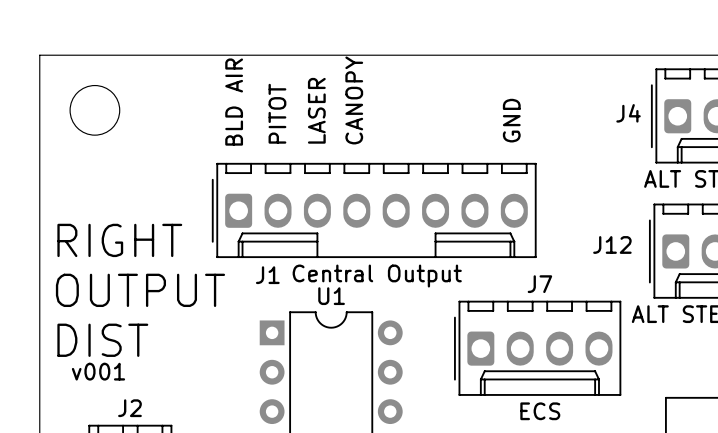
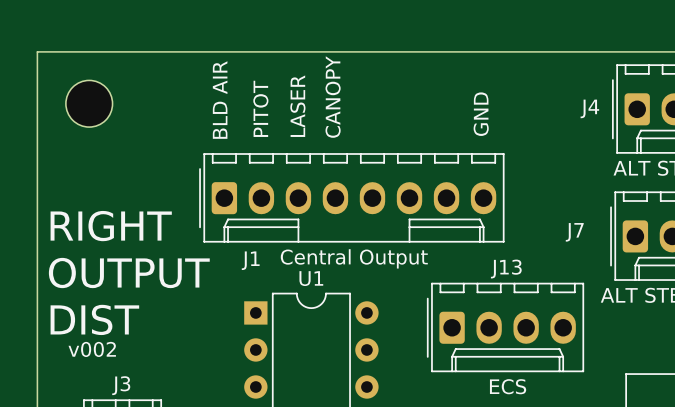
J12 name: J12 (612, 244) -> J7 (574, 232)
J7 name: J7 (539, 284) -> J13 (506, 269)
text: v001 (98, 371) -> v002 (92, 349)
J2 name: J2 (129, 408) -> J3 (121, 385)

